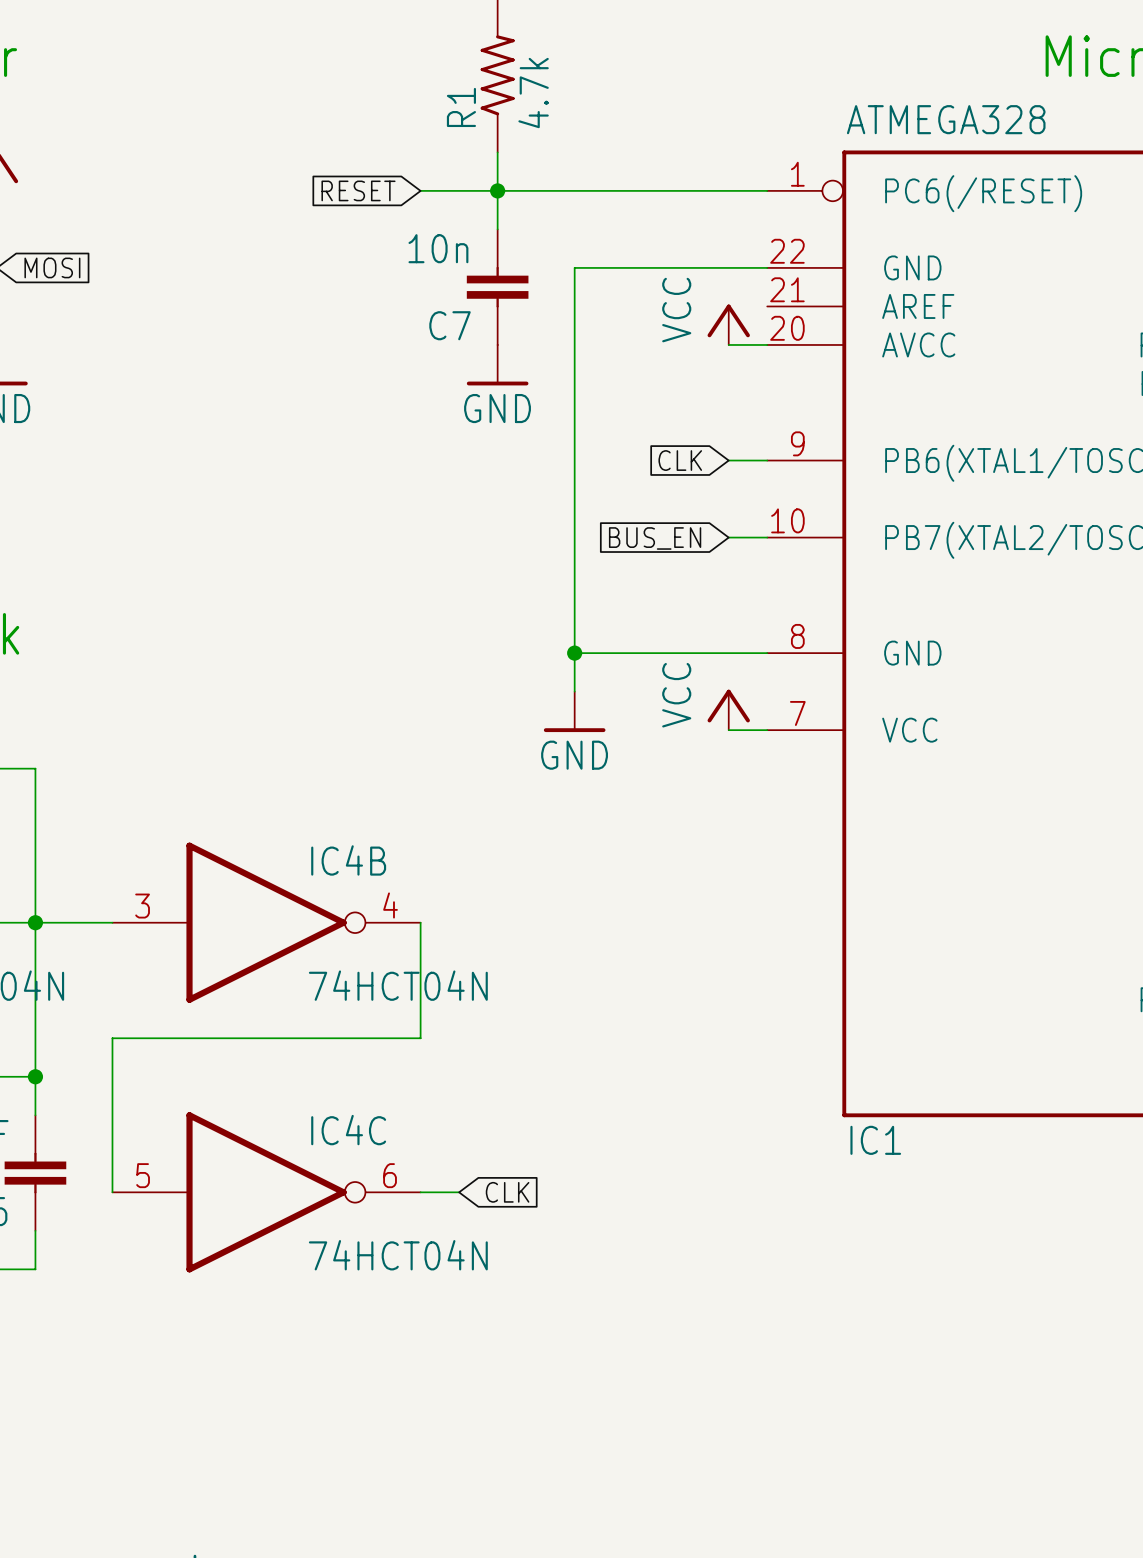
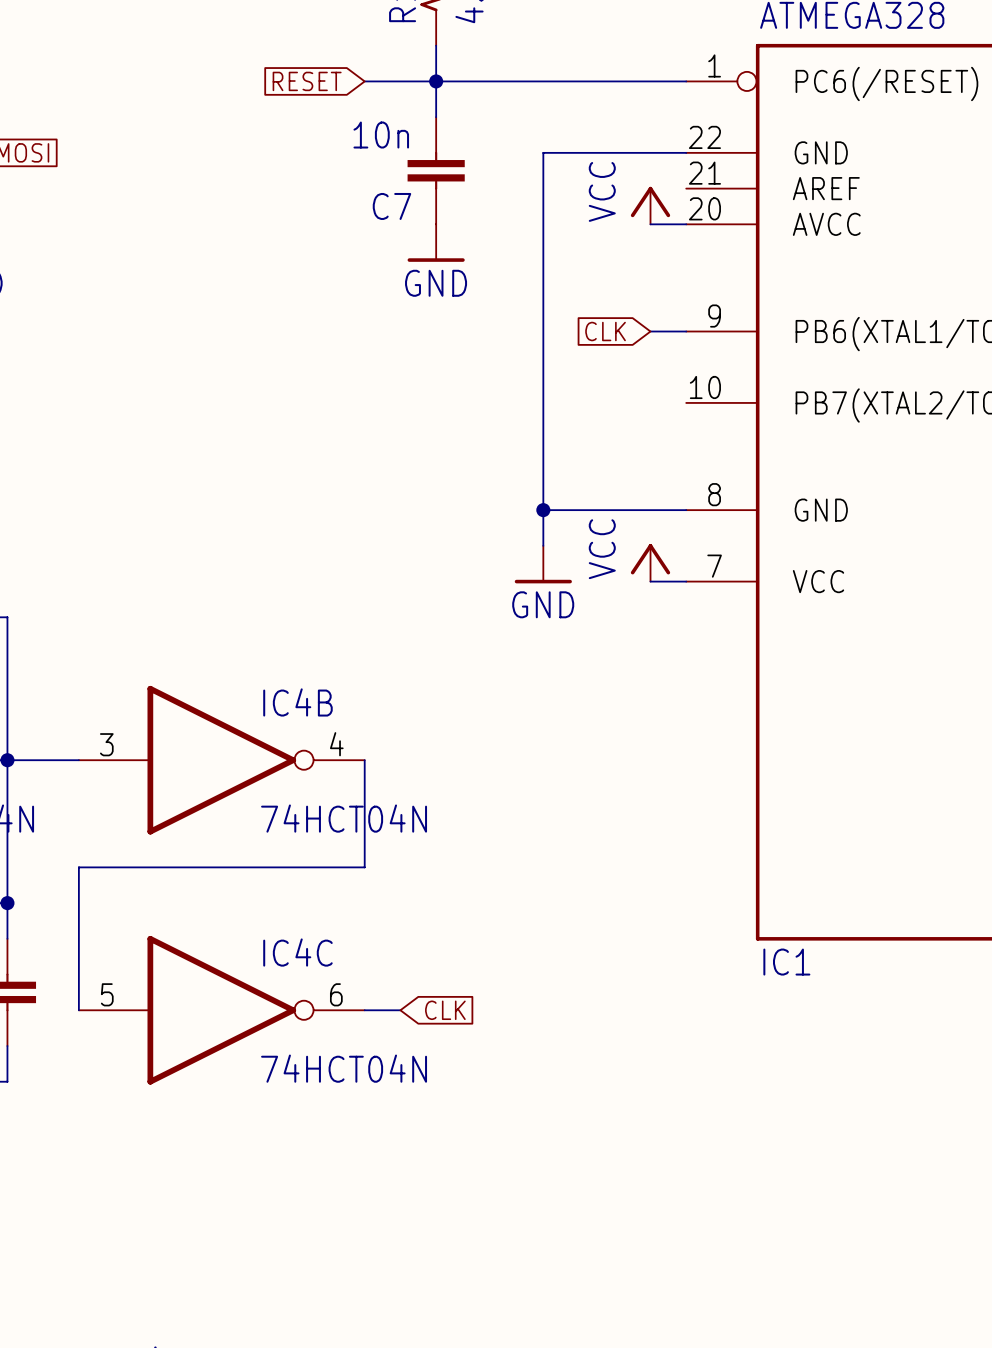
wire: (613, 267) (574, 267) (574, 691) -> (543, 152) (543, 545)
wire: (728, 537) (767, 537) -> none
global label: BUS_EN (655, 538) -> none
wire: (574, 653) (613, 653) -> none
junction position: (574, 653) -> (543, 510)
power symbol position: GND (574, 711) -> GND (543, 564)

